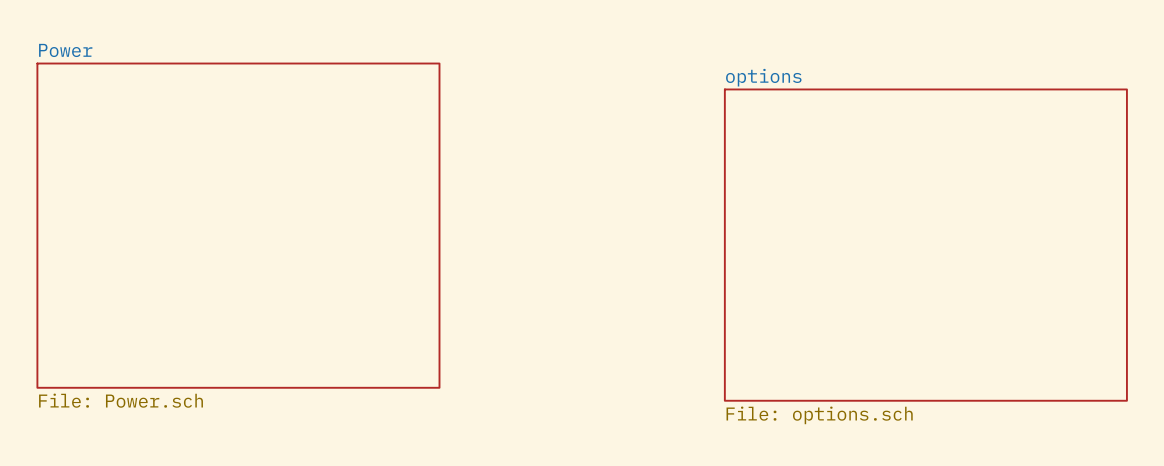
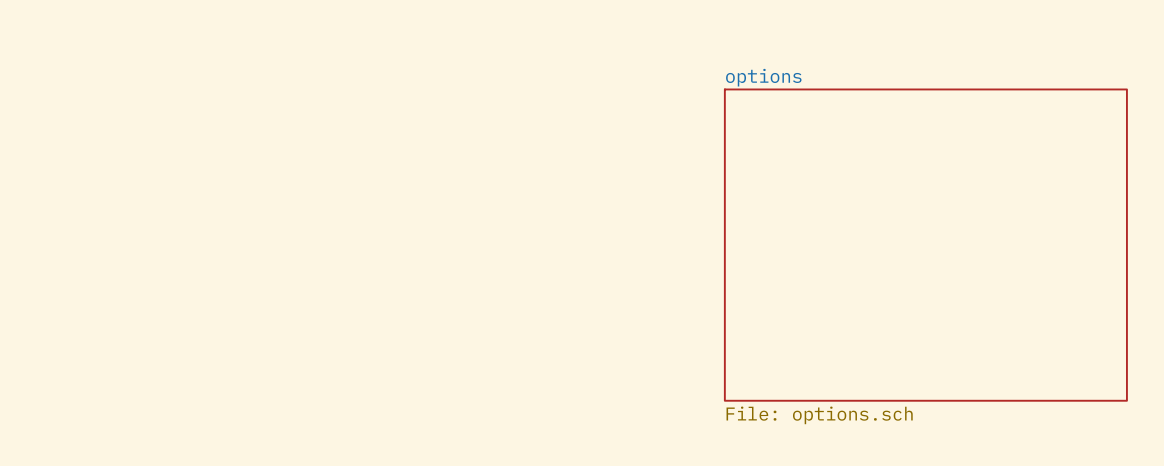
sheet Power: File: Power.sch (238, 225) -> none

